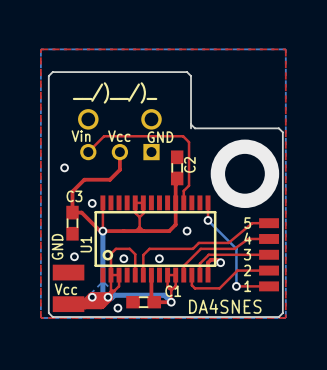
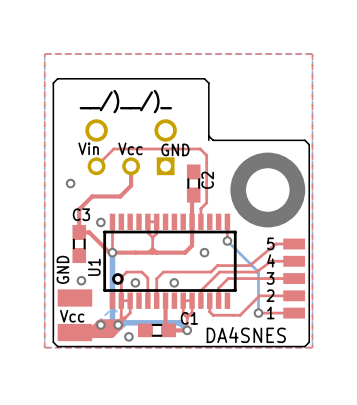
top track: (220, 262) (217, 259) (210, 259) (208, 262) (208, 275) -> none
via: (220, 262) -> none

